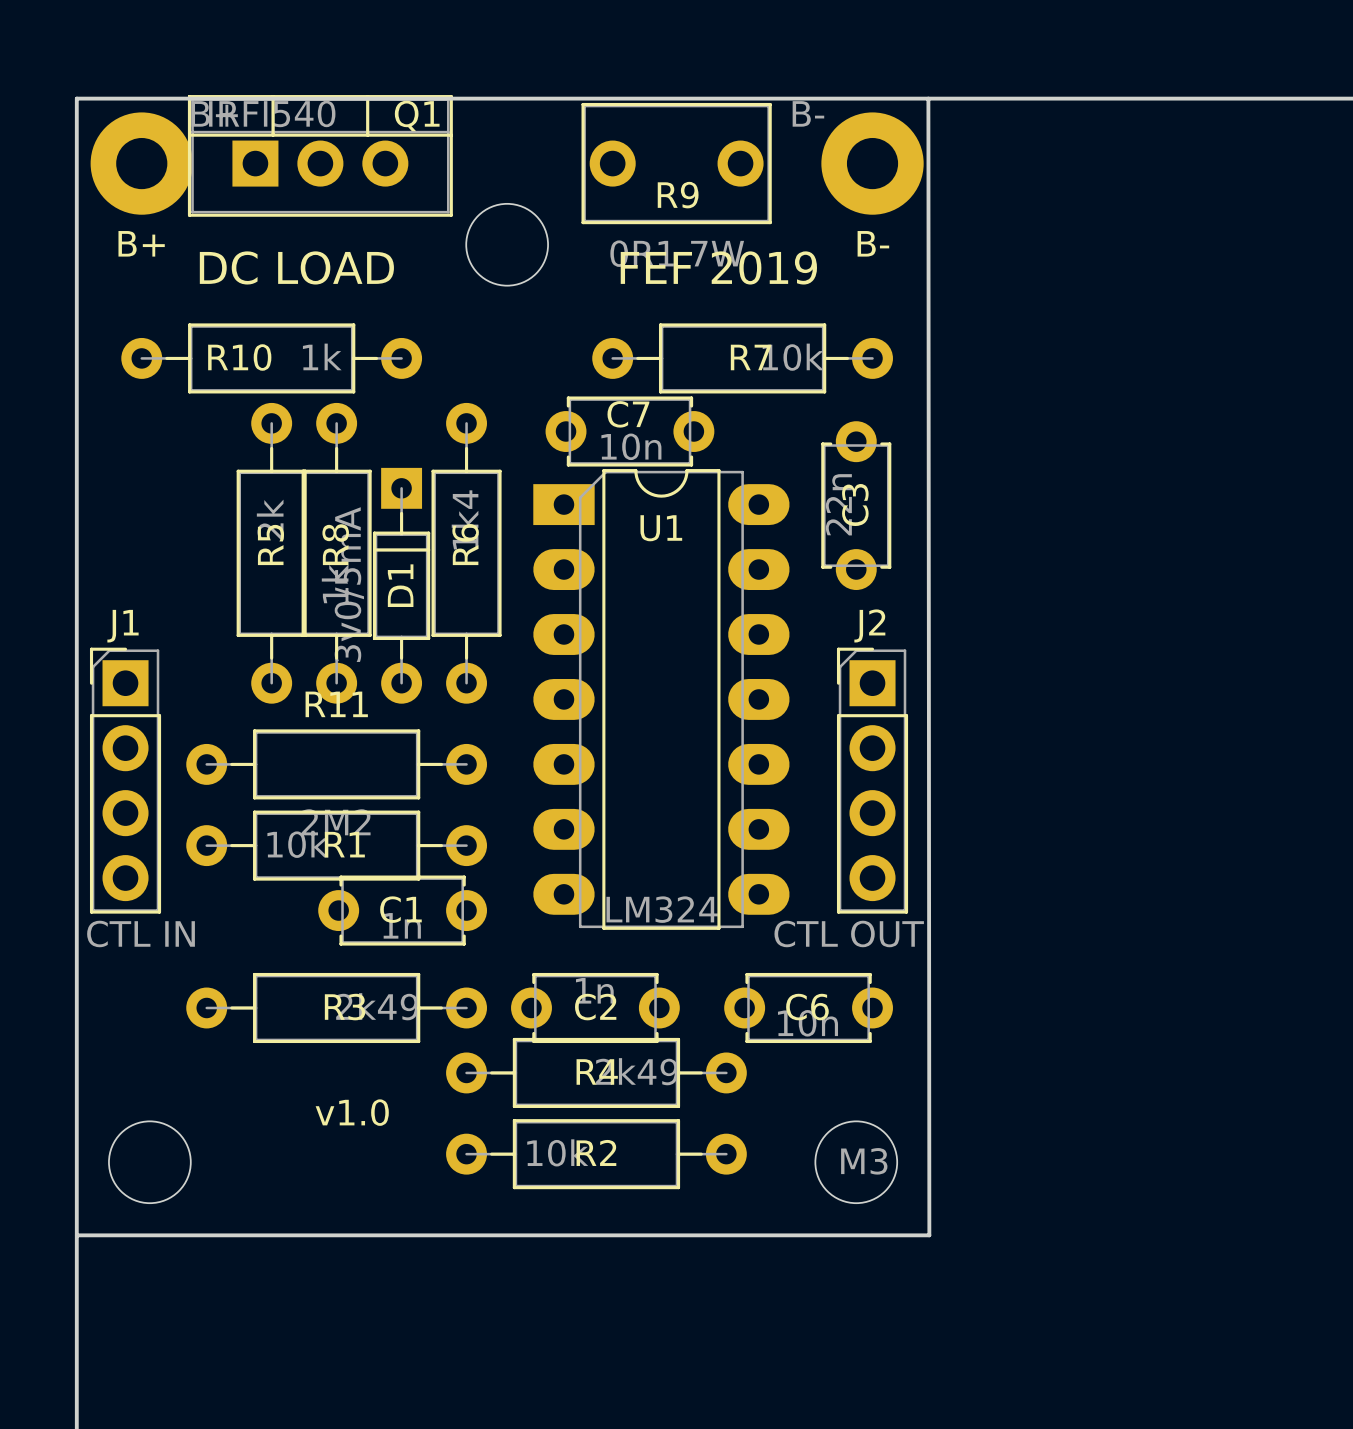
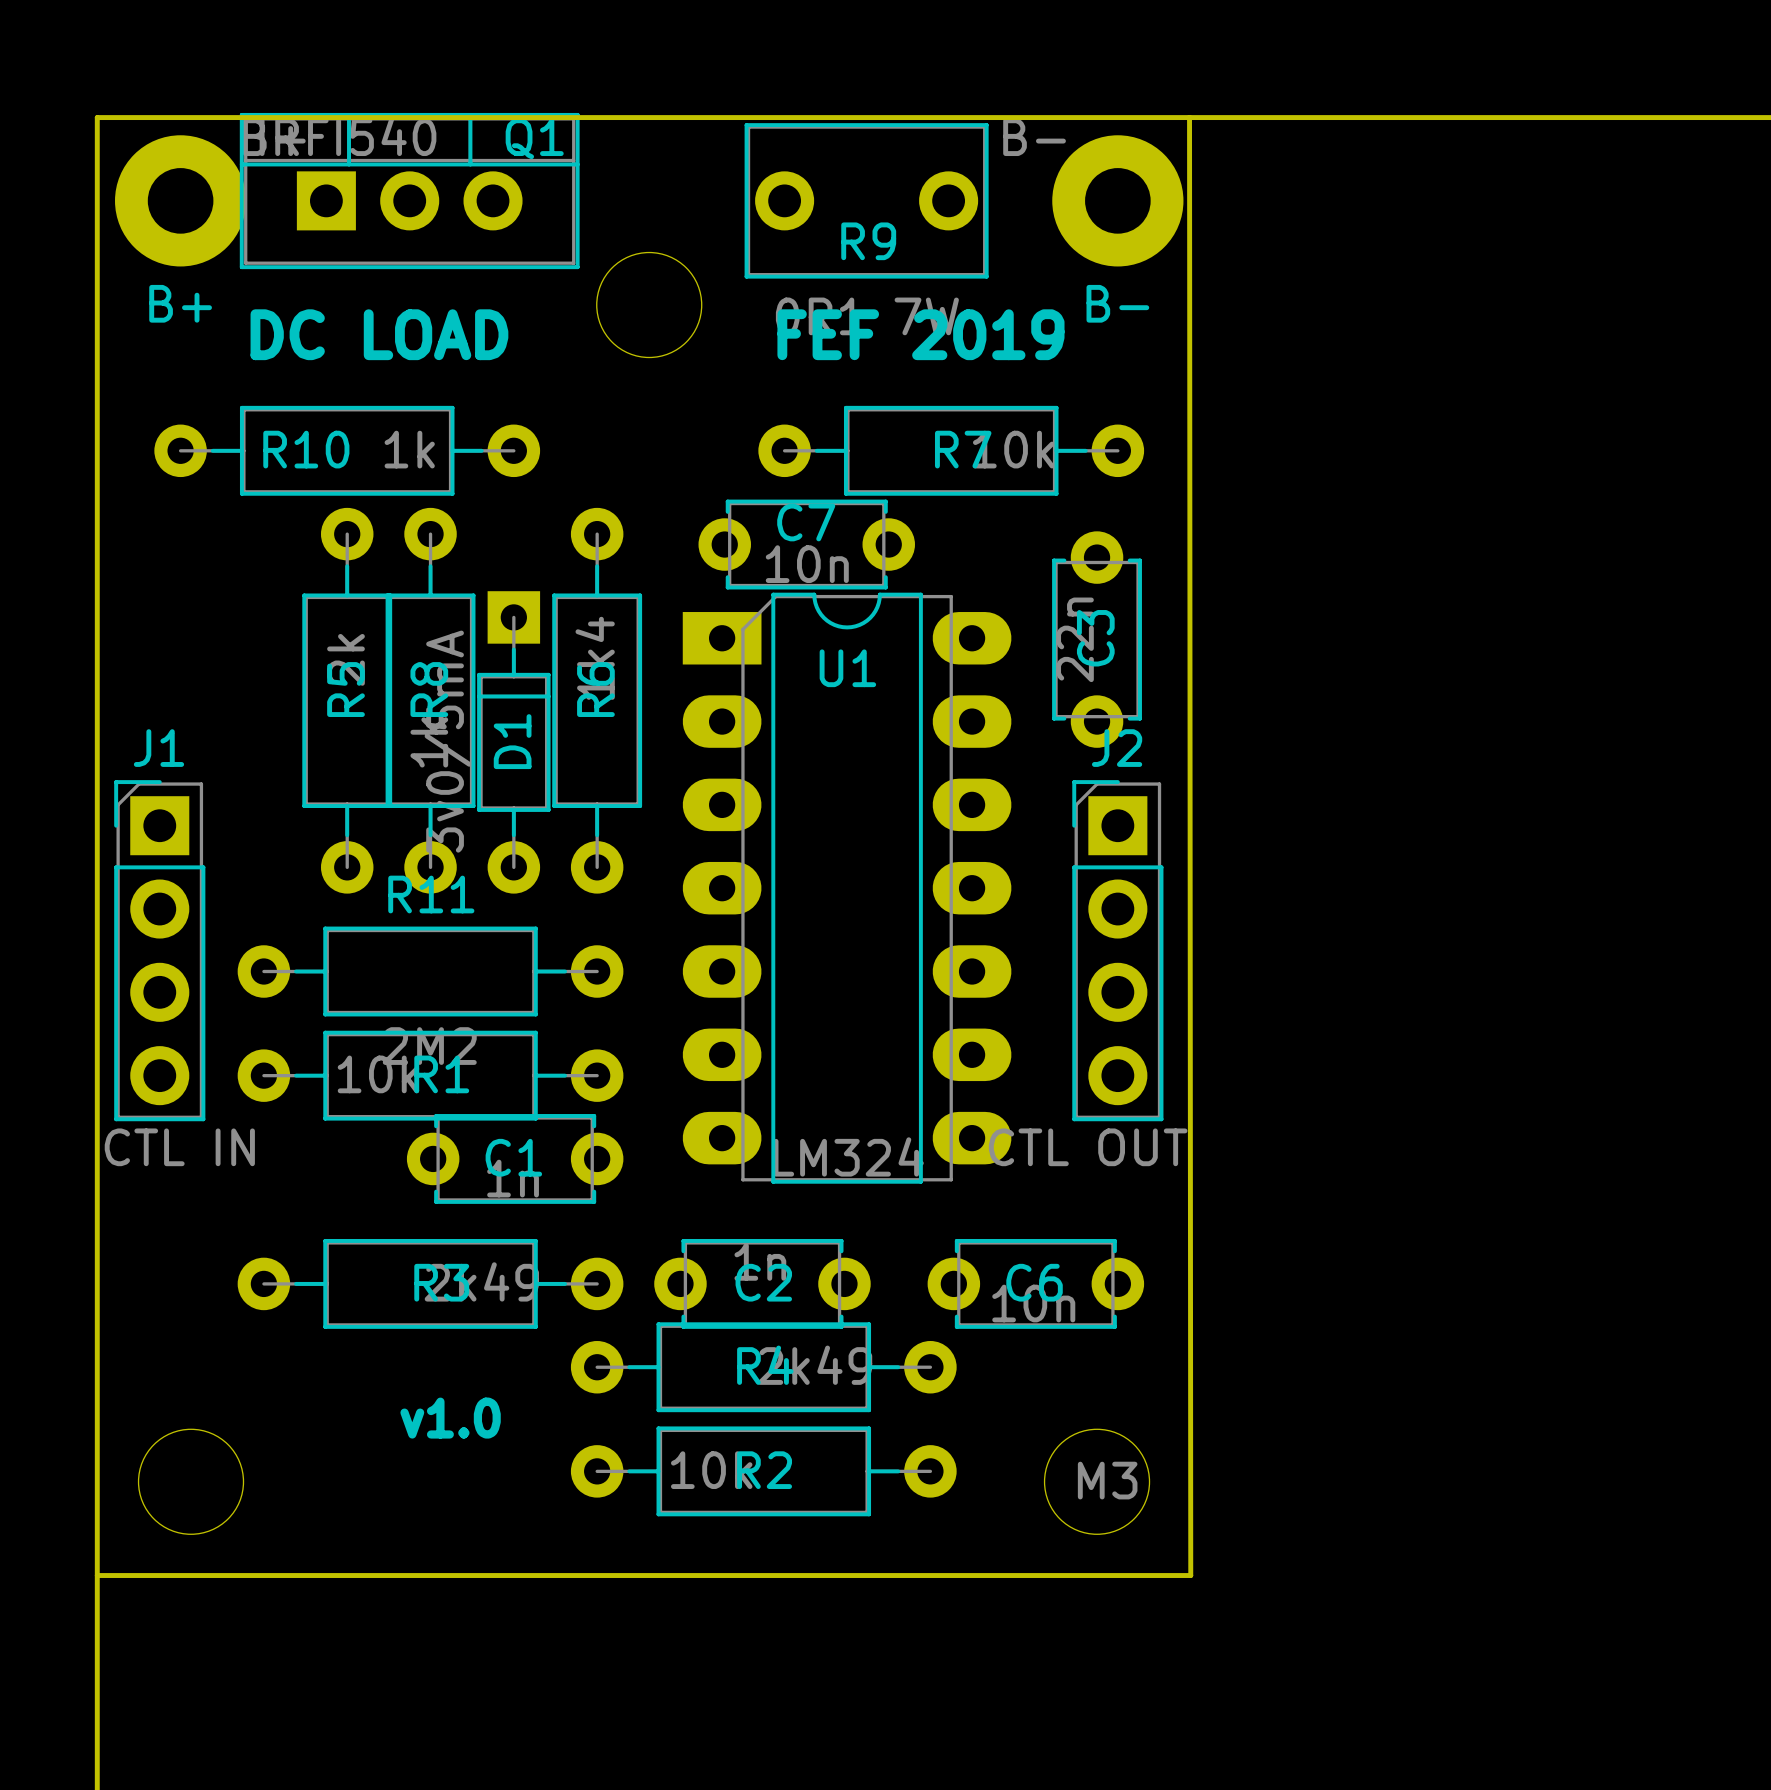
J1 position: (125, 780) -> (159, 950)
J2 position: (872, 780) -> (1117, 950)

